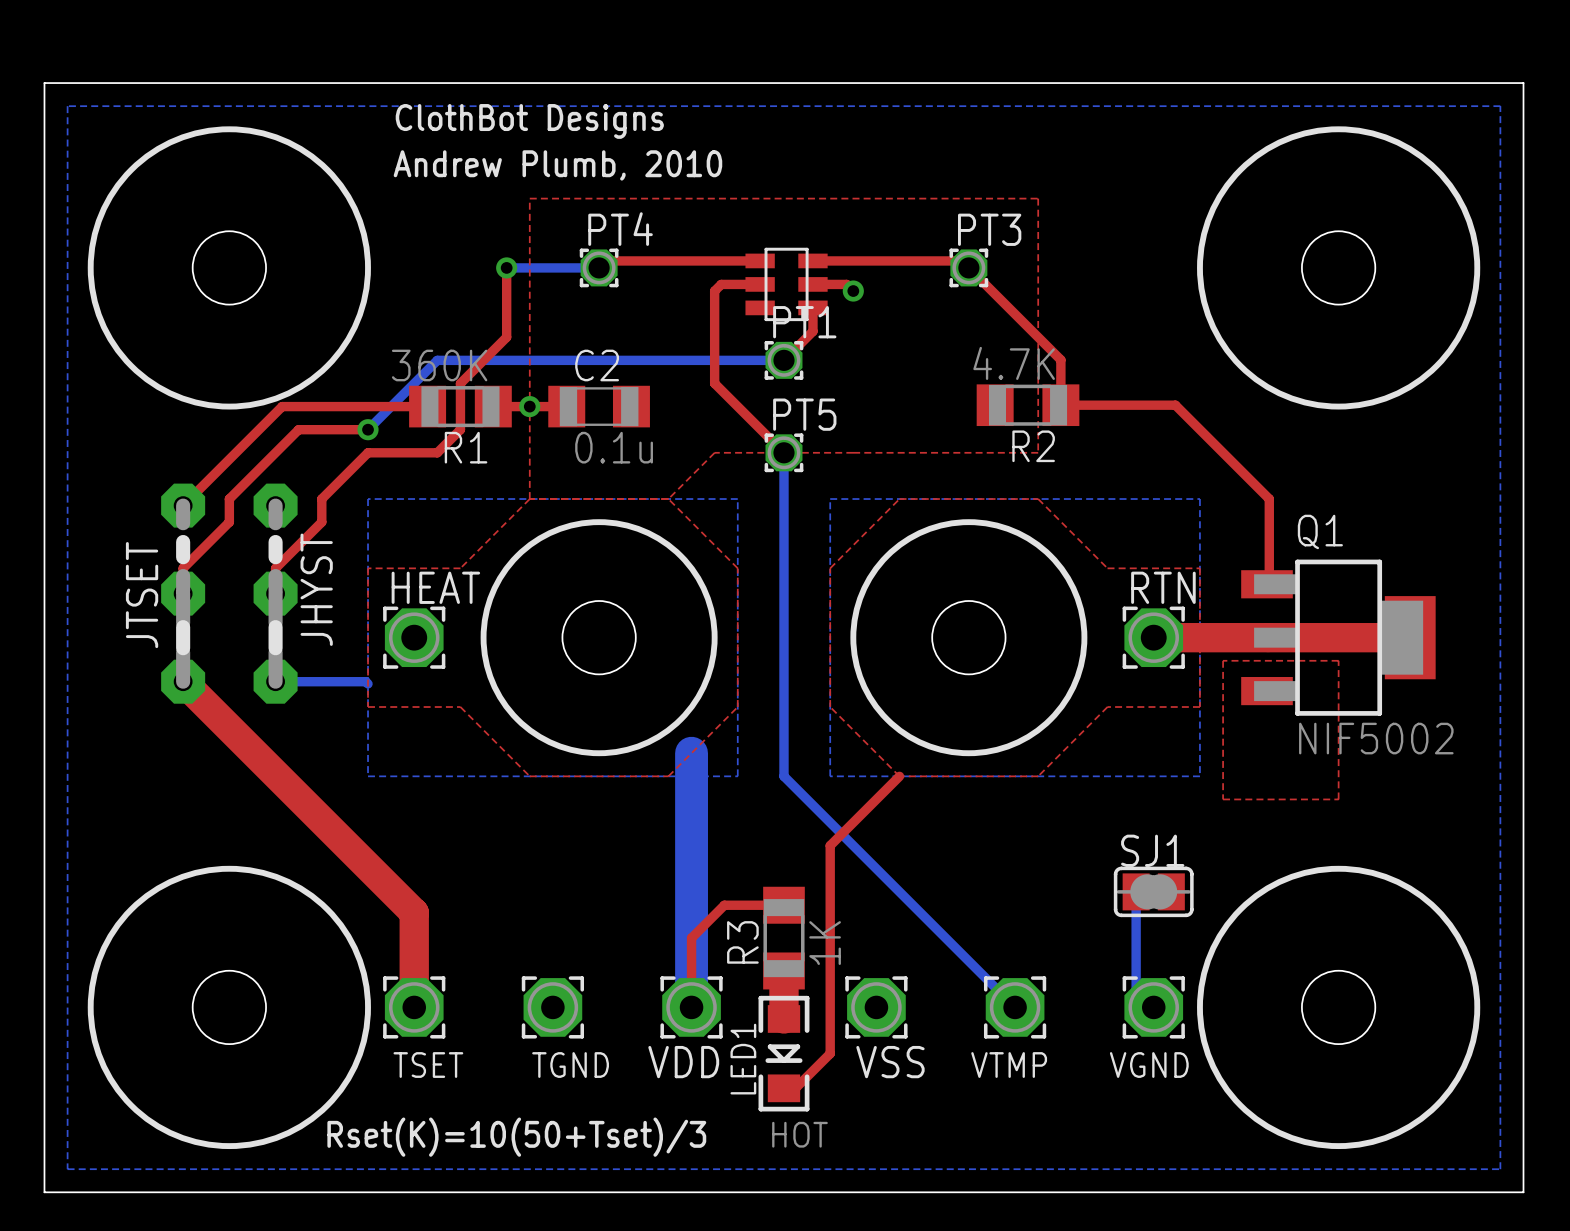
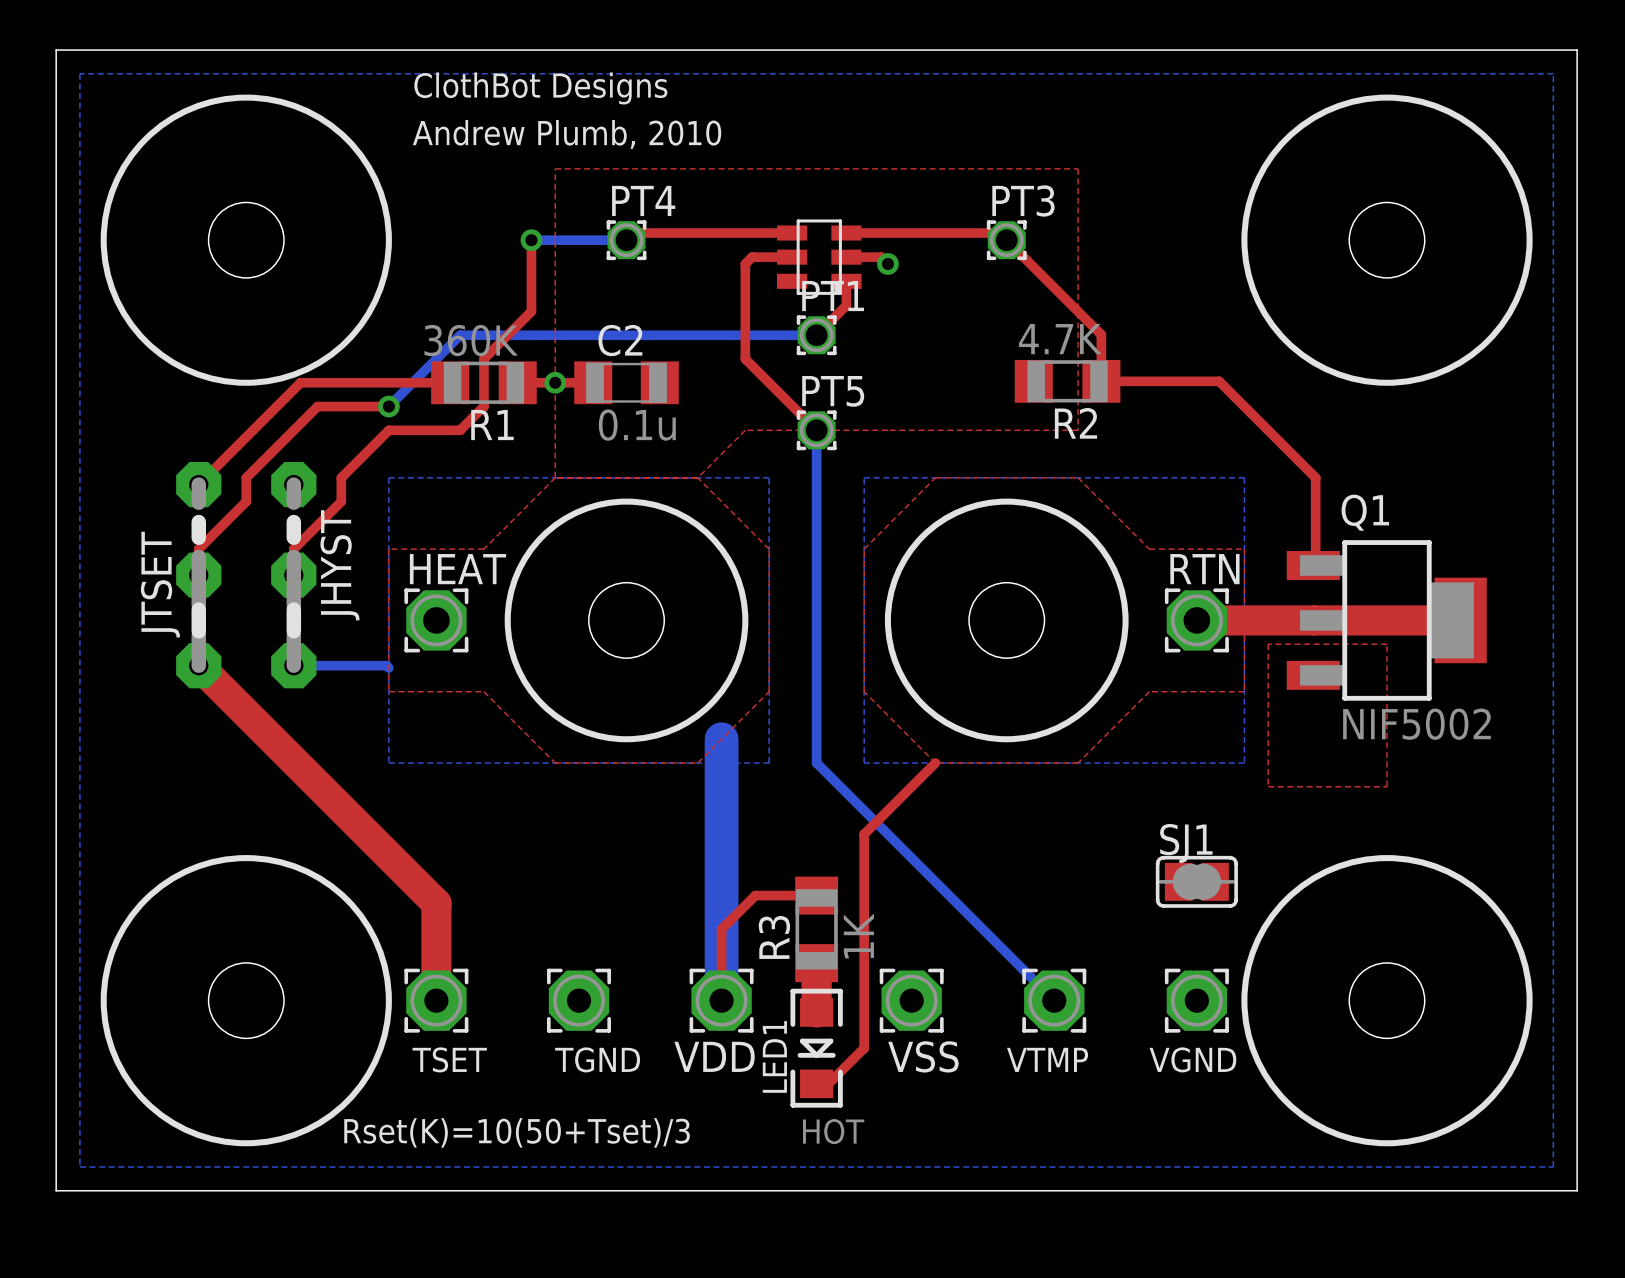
bottom track: (1136, 891) (1136, 989) (1153, 1007) -> none

